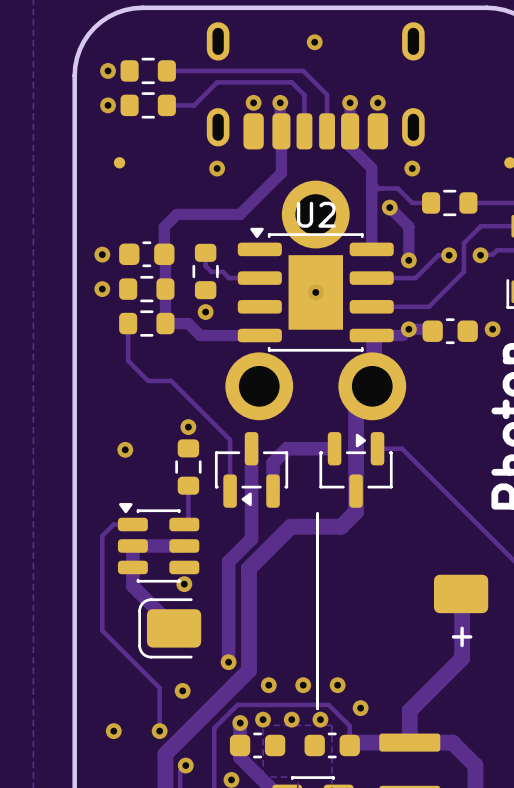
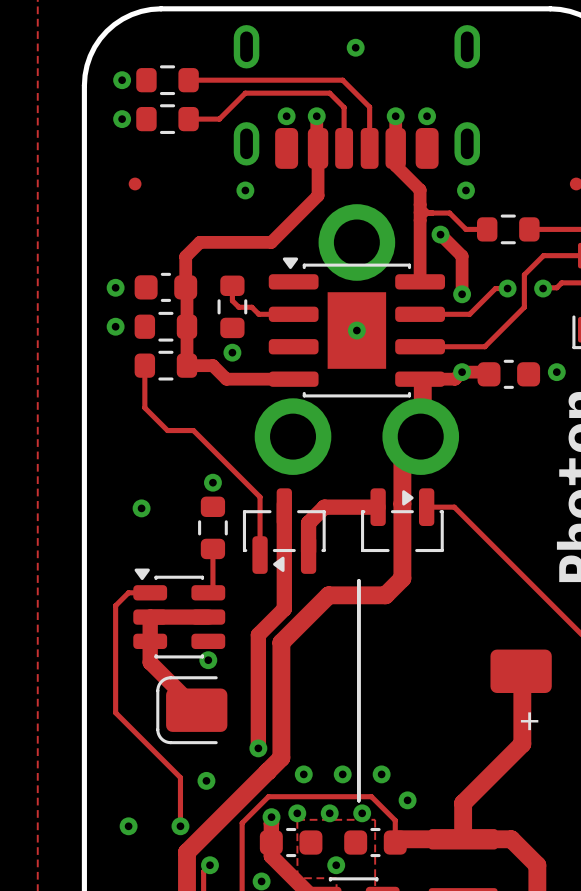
U2: (315, 289) -> none
part: none -> (356, 327)
via: none -> (336, 865)

